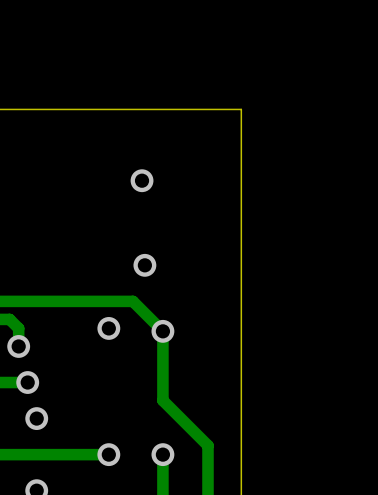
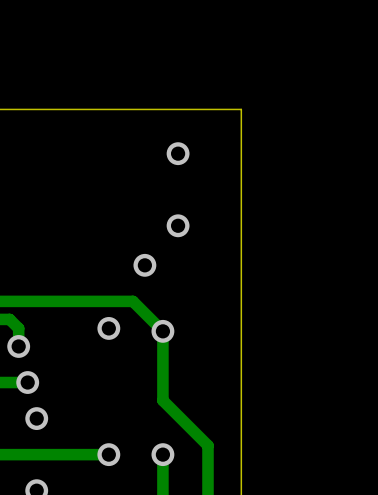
via: none -> (178, 153)
via: (142, 180) -> none
via: none -> (178, 225)

